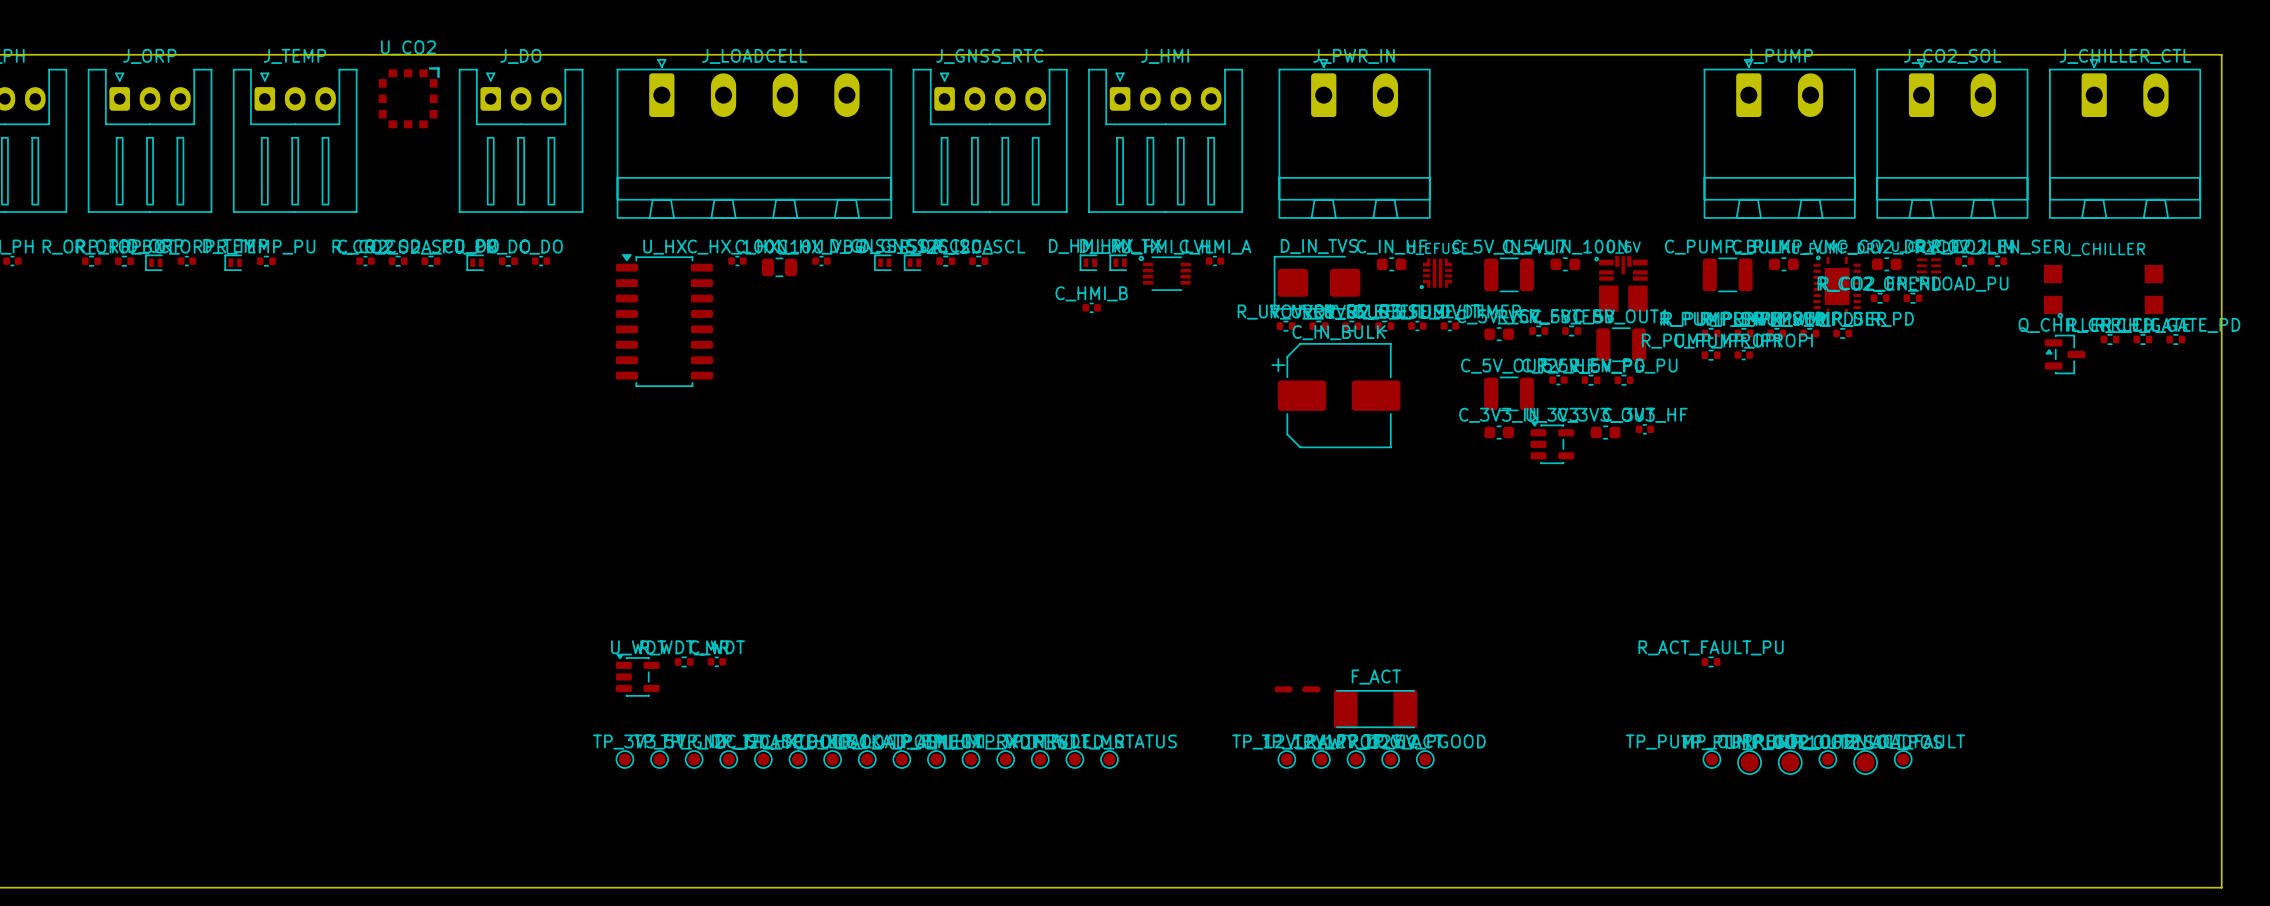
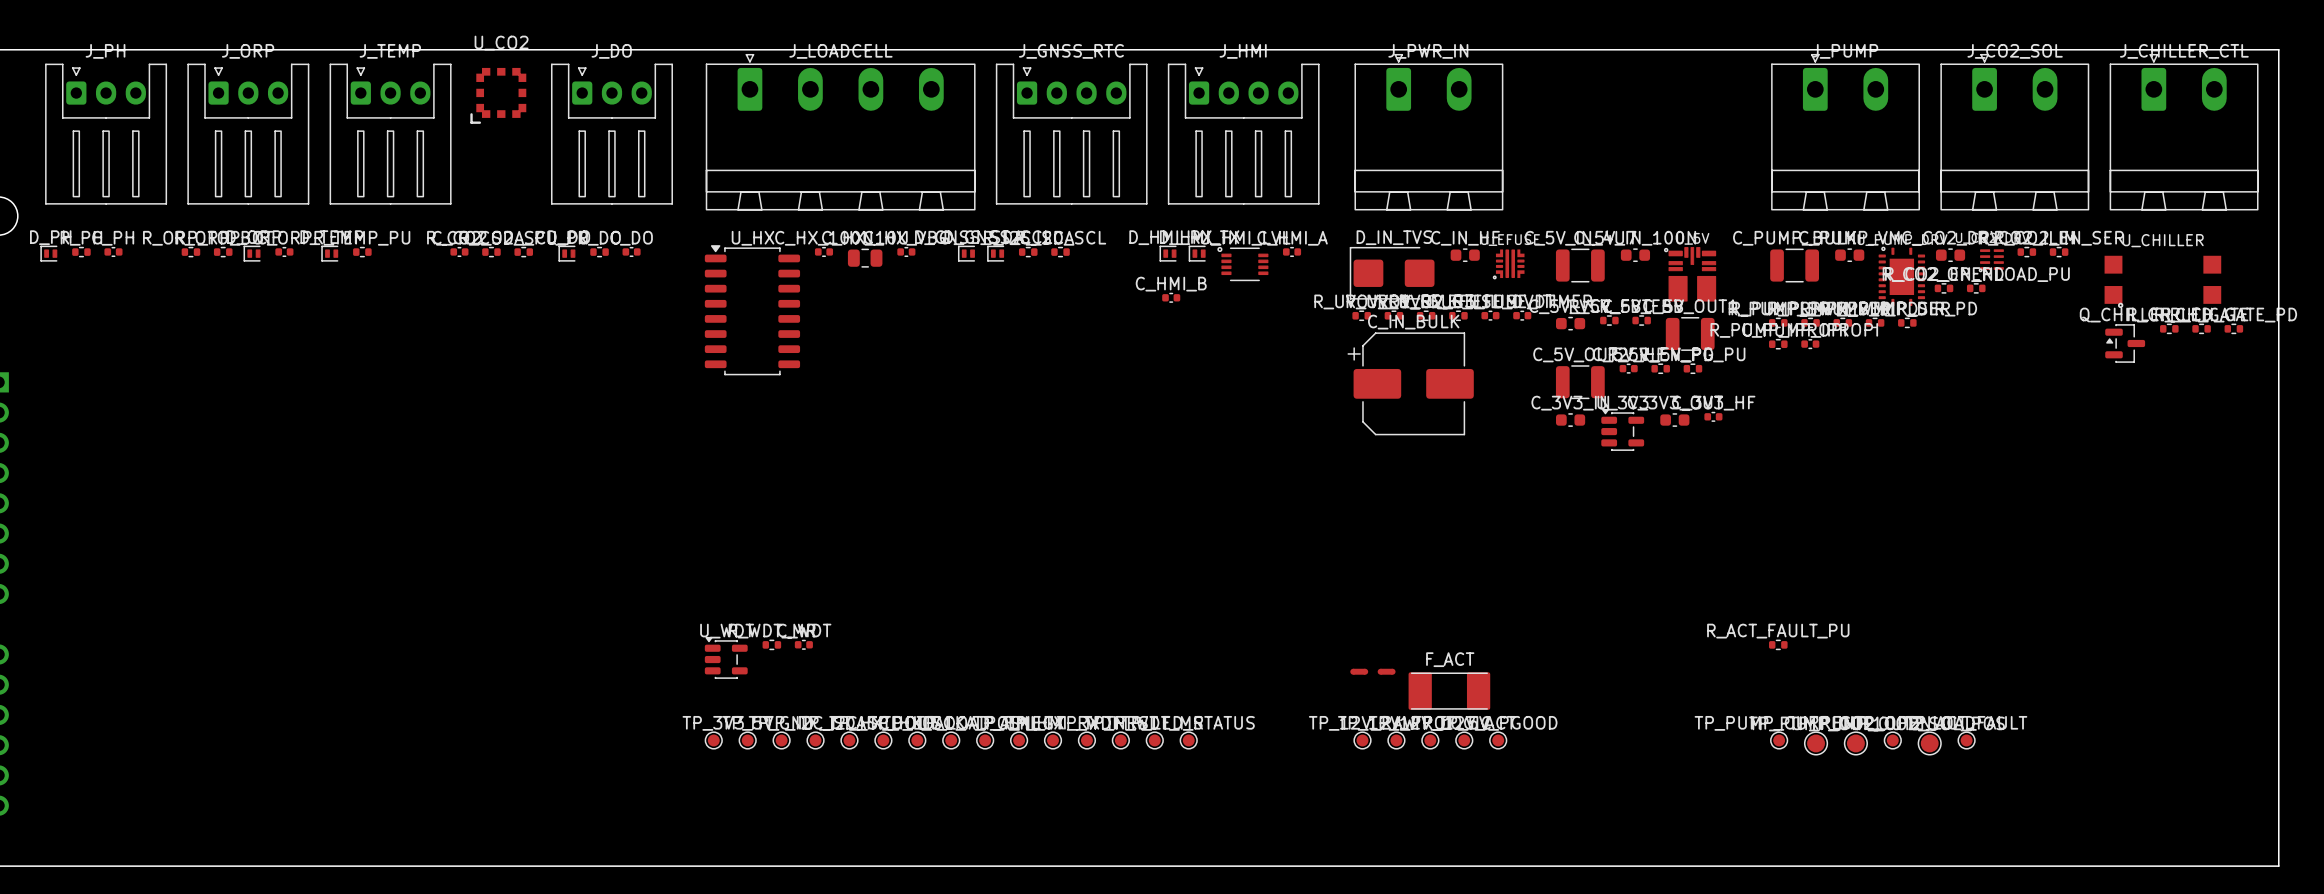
U_CO2 footprint: [378, 67, 440, 129] -> [470, 67, 527, 124]

